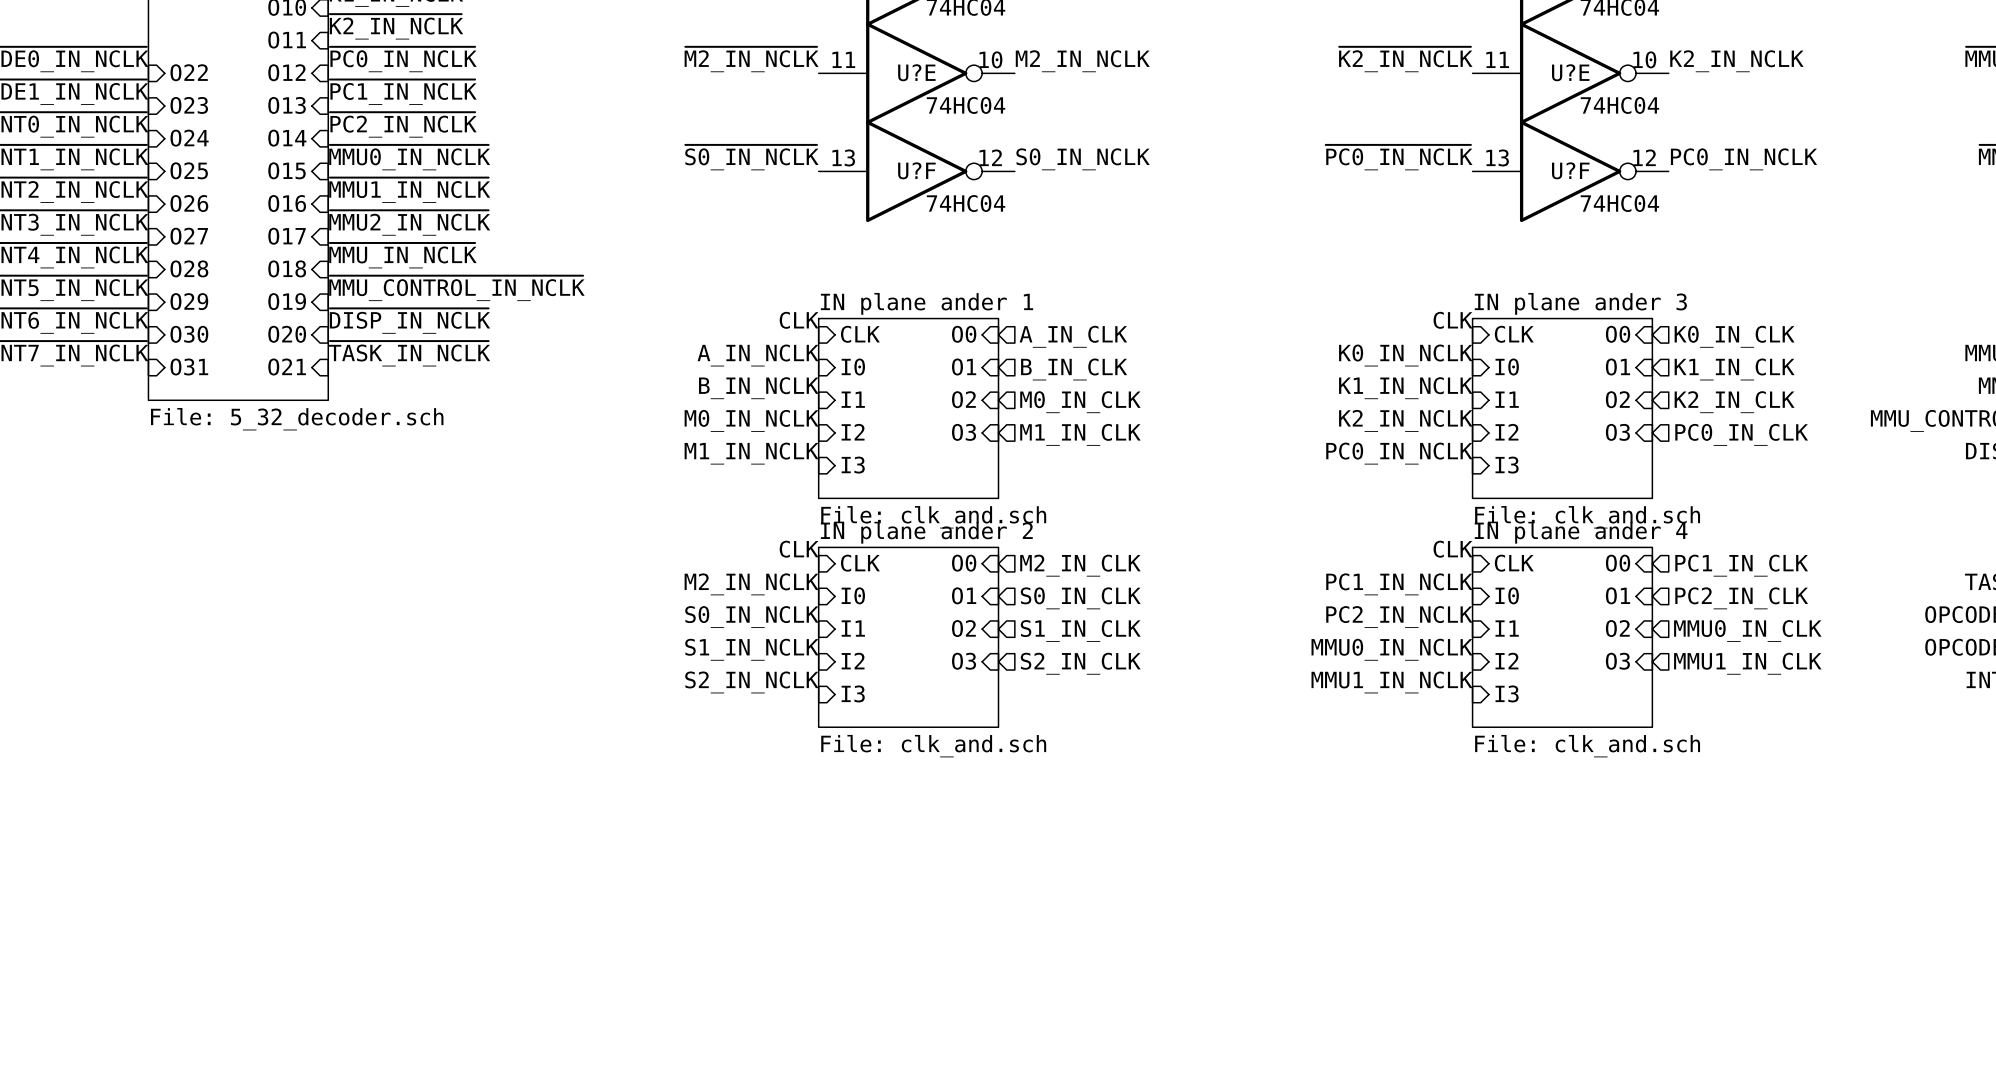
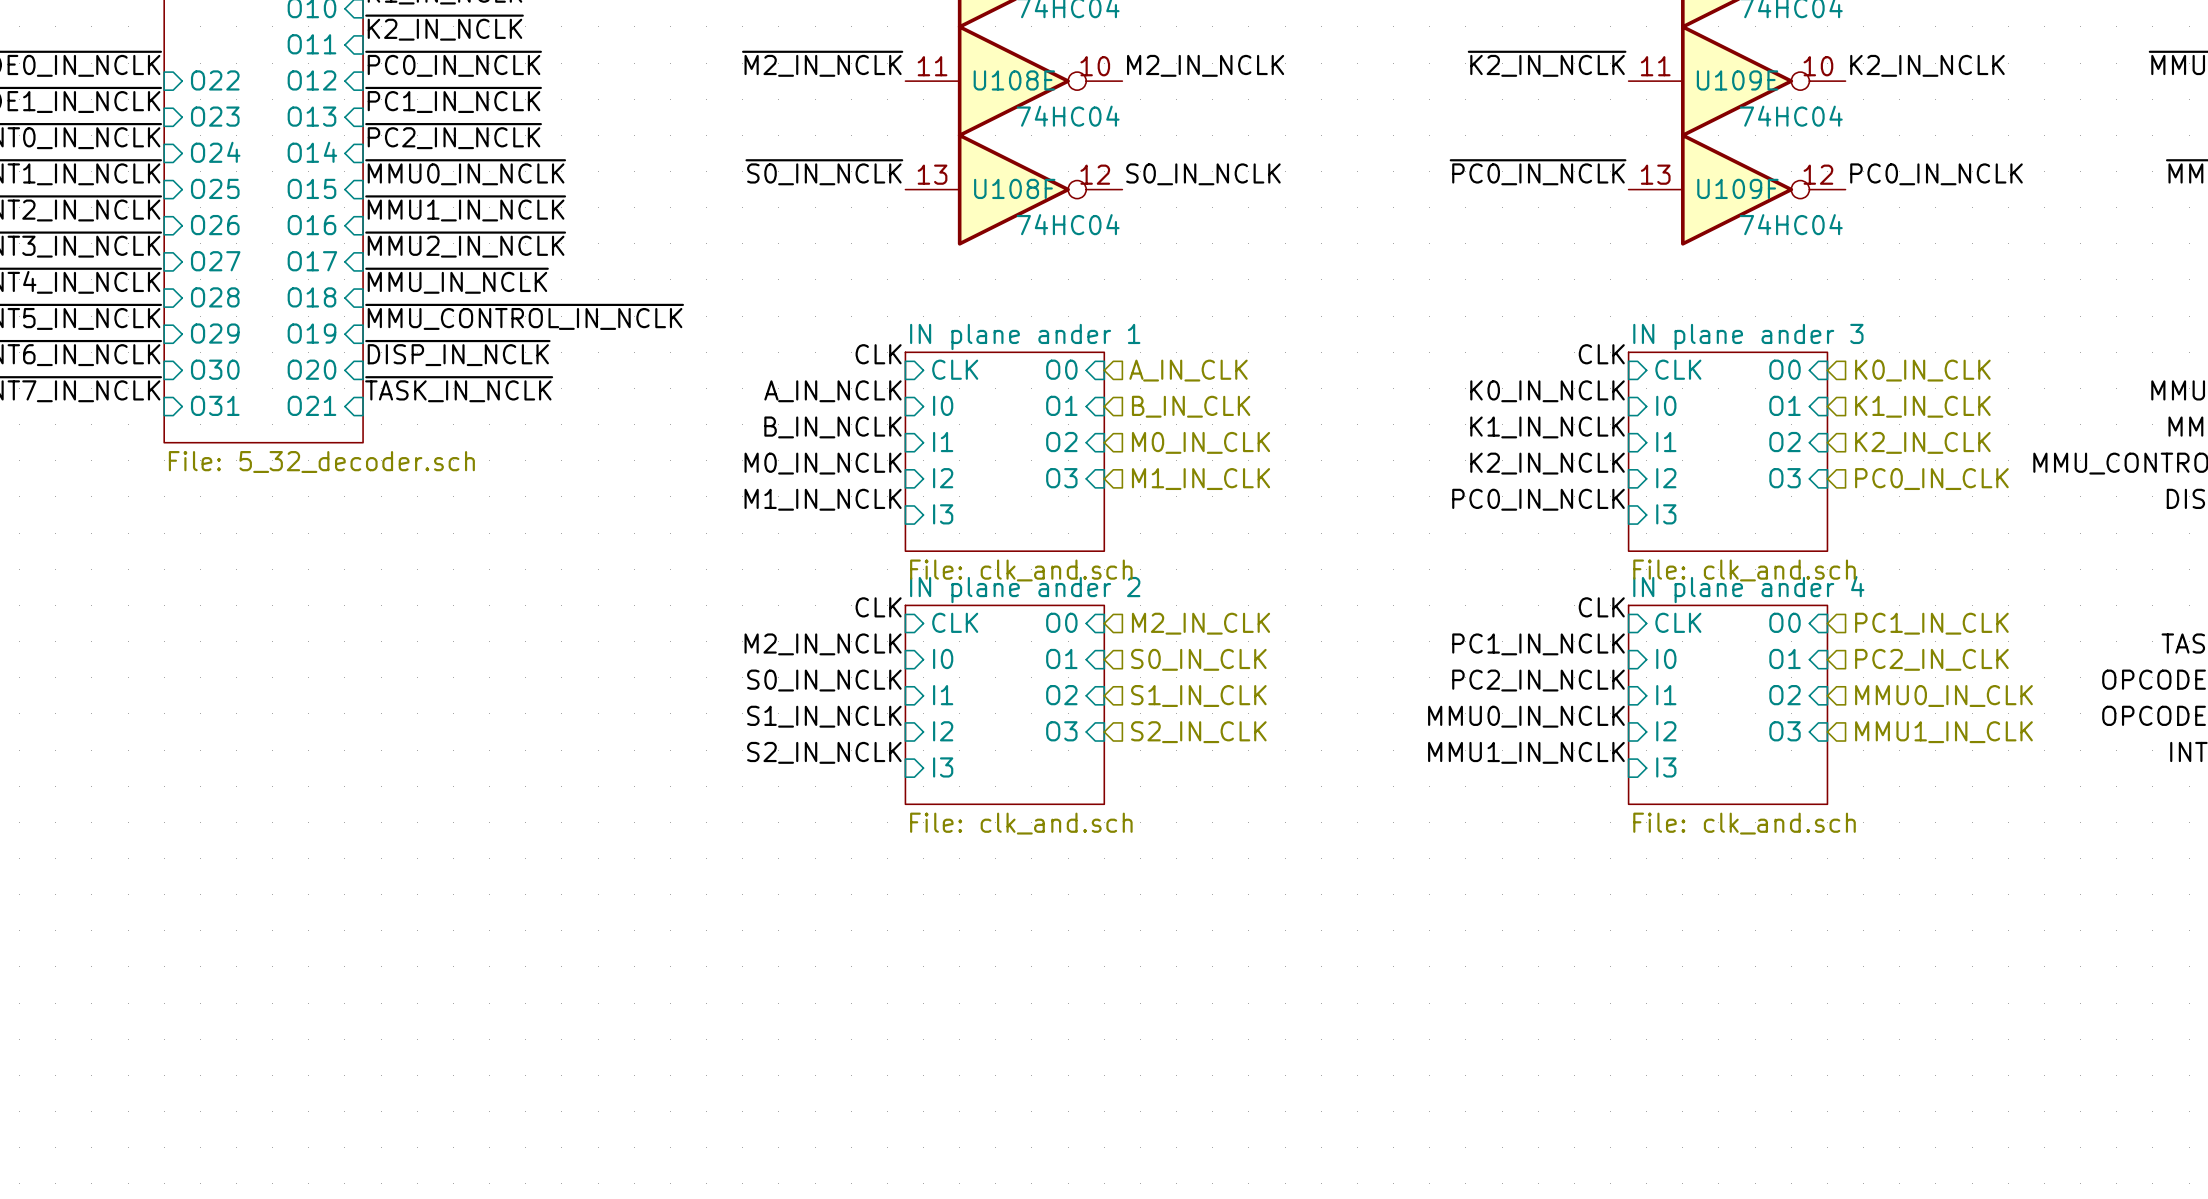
U?E name: U?E (916, 72) -> U108E (1014, 80)
U?E name: U?E (1570, 72) -> U109E (1737, 80)
U?F name: U?F (916, 170) -> U108F (1014, 188)
U?F name: U?F (1570, 170) -> U109F (1737, 188)

